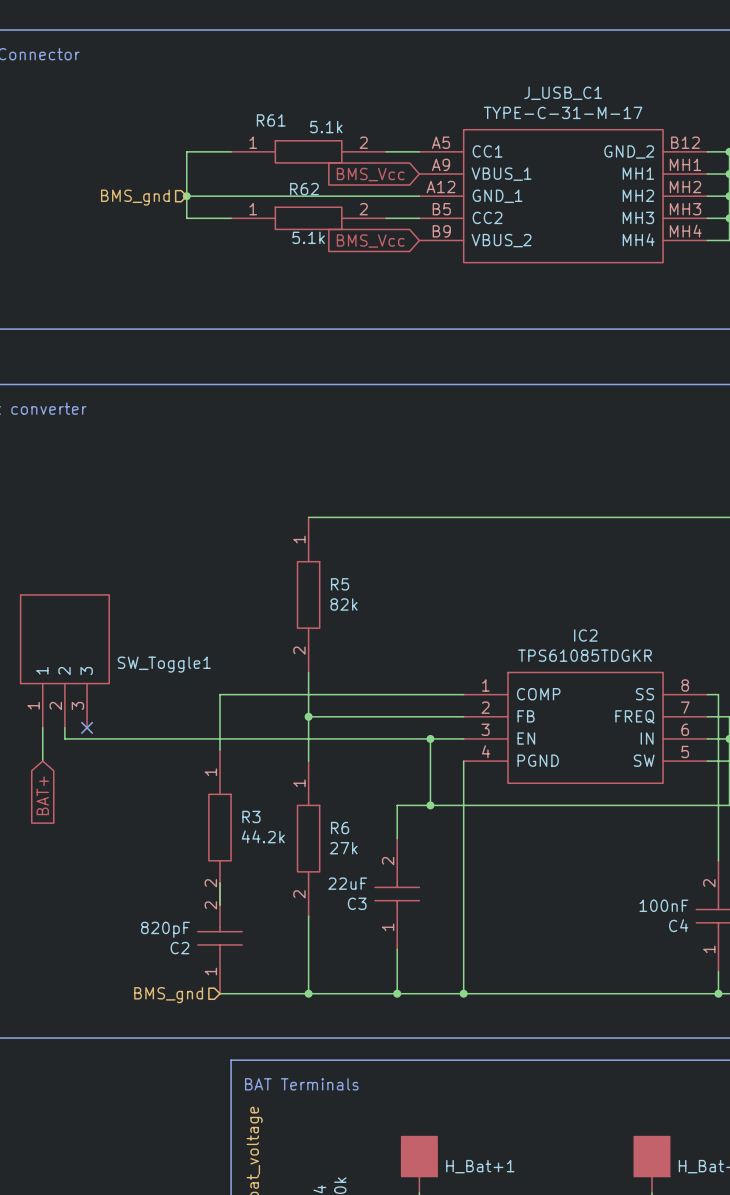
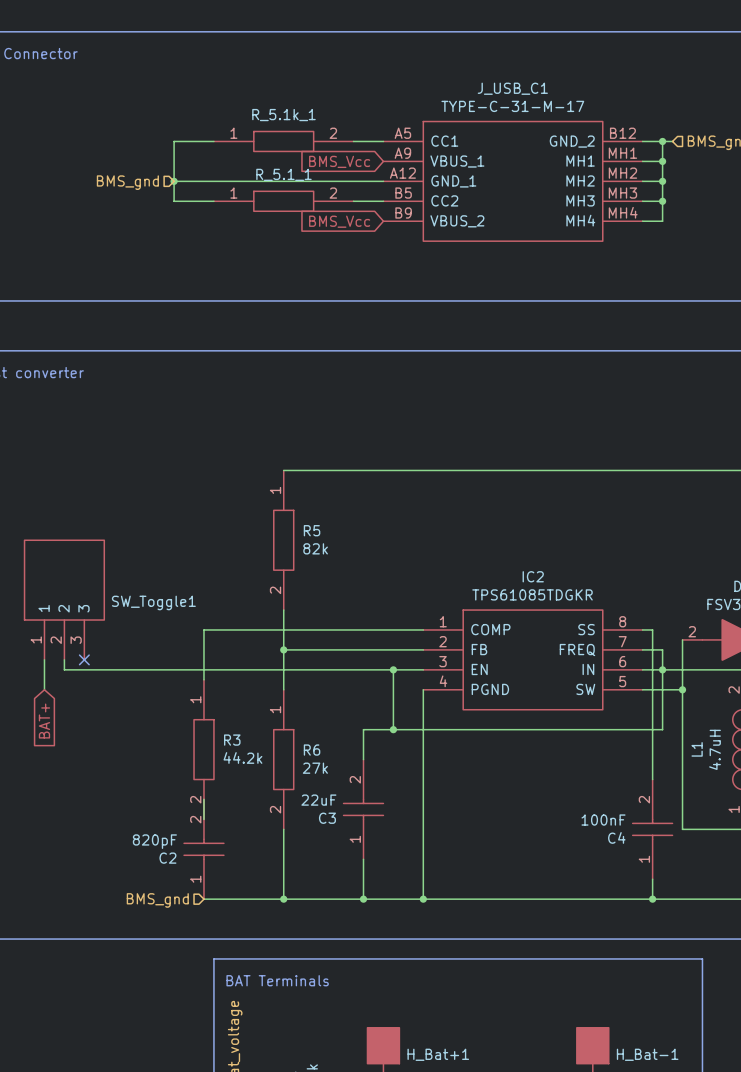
R61 name: R61 (271, 120) -> R_5.1k_1 (283, 115)
R61 value: 5.1k (326, 127) -> none
R62 name: R62 (304, 189) -> R_5.1_1 (283, 174)
R62 value: 5.1k (308, 237) -> none

